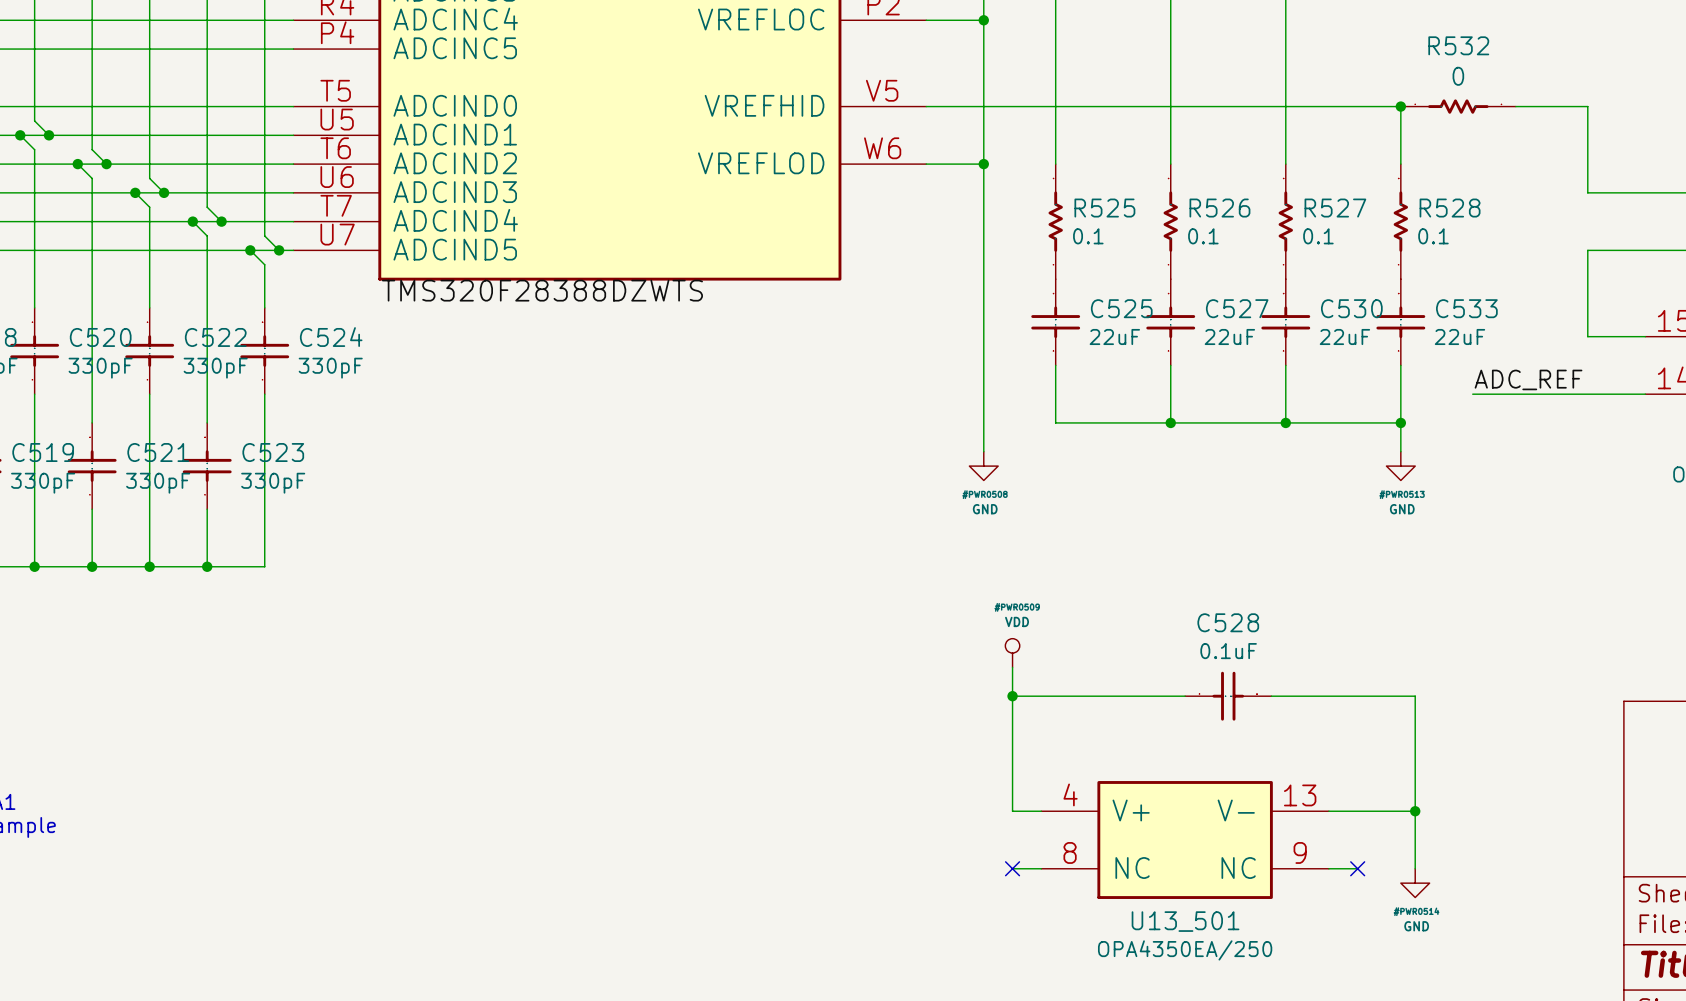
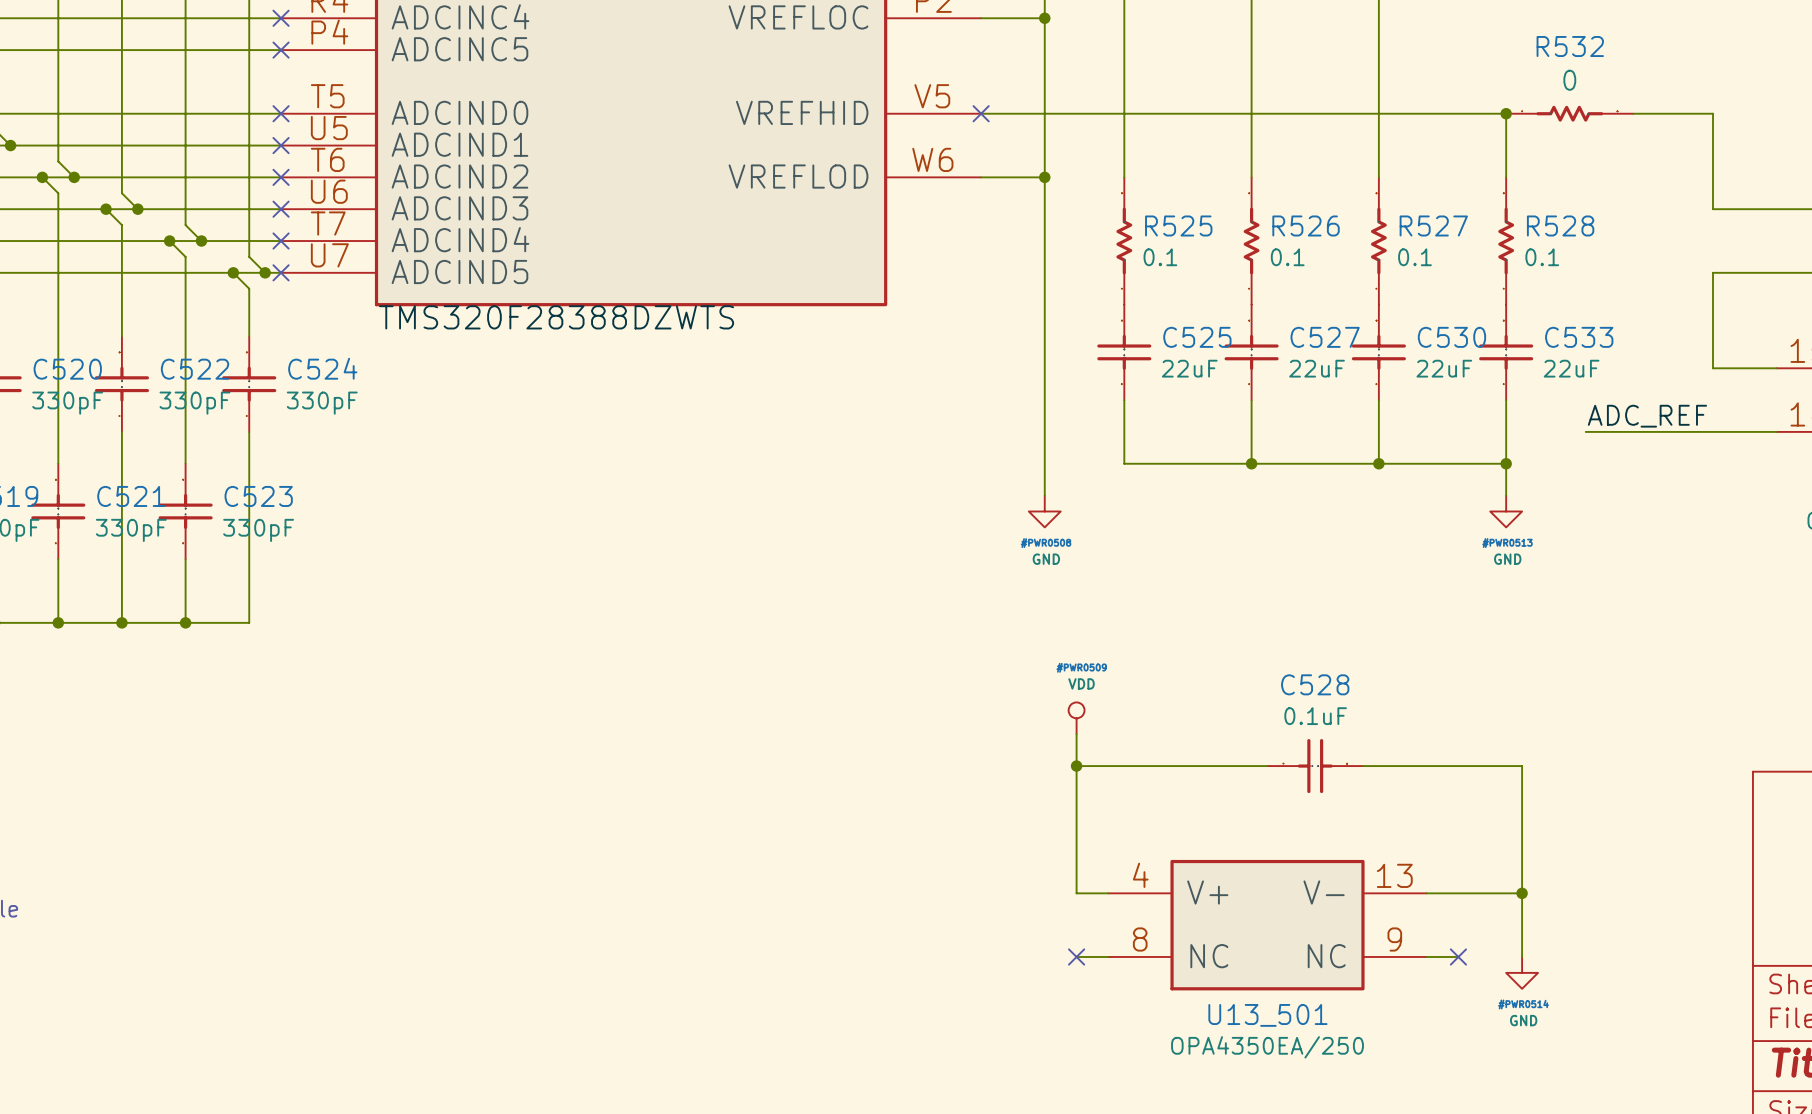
no-connect mark: none -> (281, 18)
no-connect mark: none -> (281, 50)
no-connect mark: none -> (281, 113)
no-connect mark: none -> (981, 113)
no-connect mark: none -> (281, 145)
no-connect mark: none -> (281, 177)
no-connect mark: none -> (281, 209)
no-connect mark: none -> (281, 241)
no-connect mark: none -> (281, 272)

